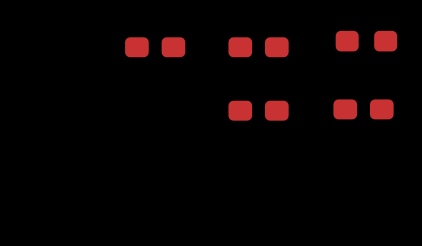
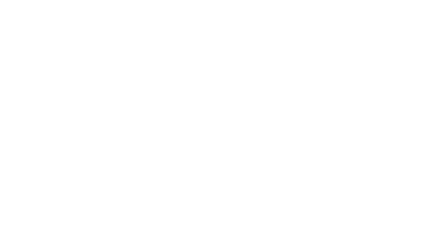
part: (366, 41) -> none
part: (155, 47) -> none
part: (258, 47) -> none
part: (363, 109) -> none
part: (258, 110) -> none

